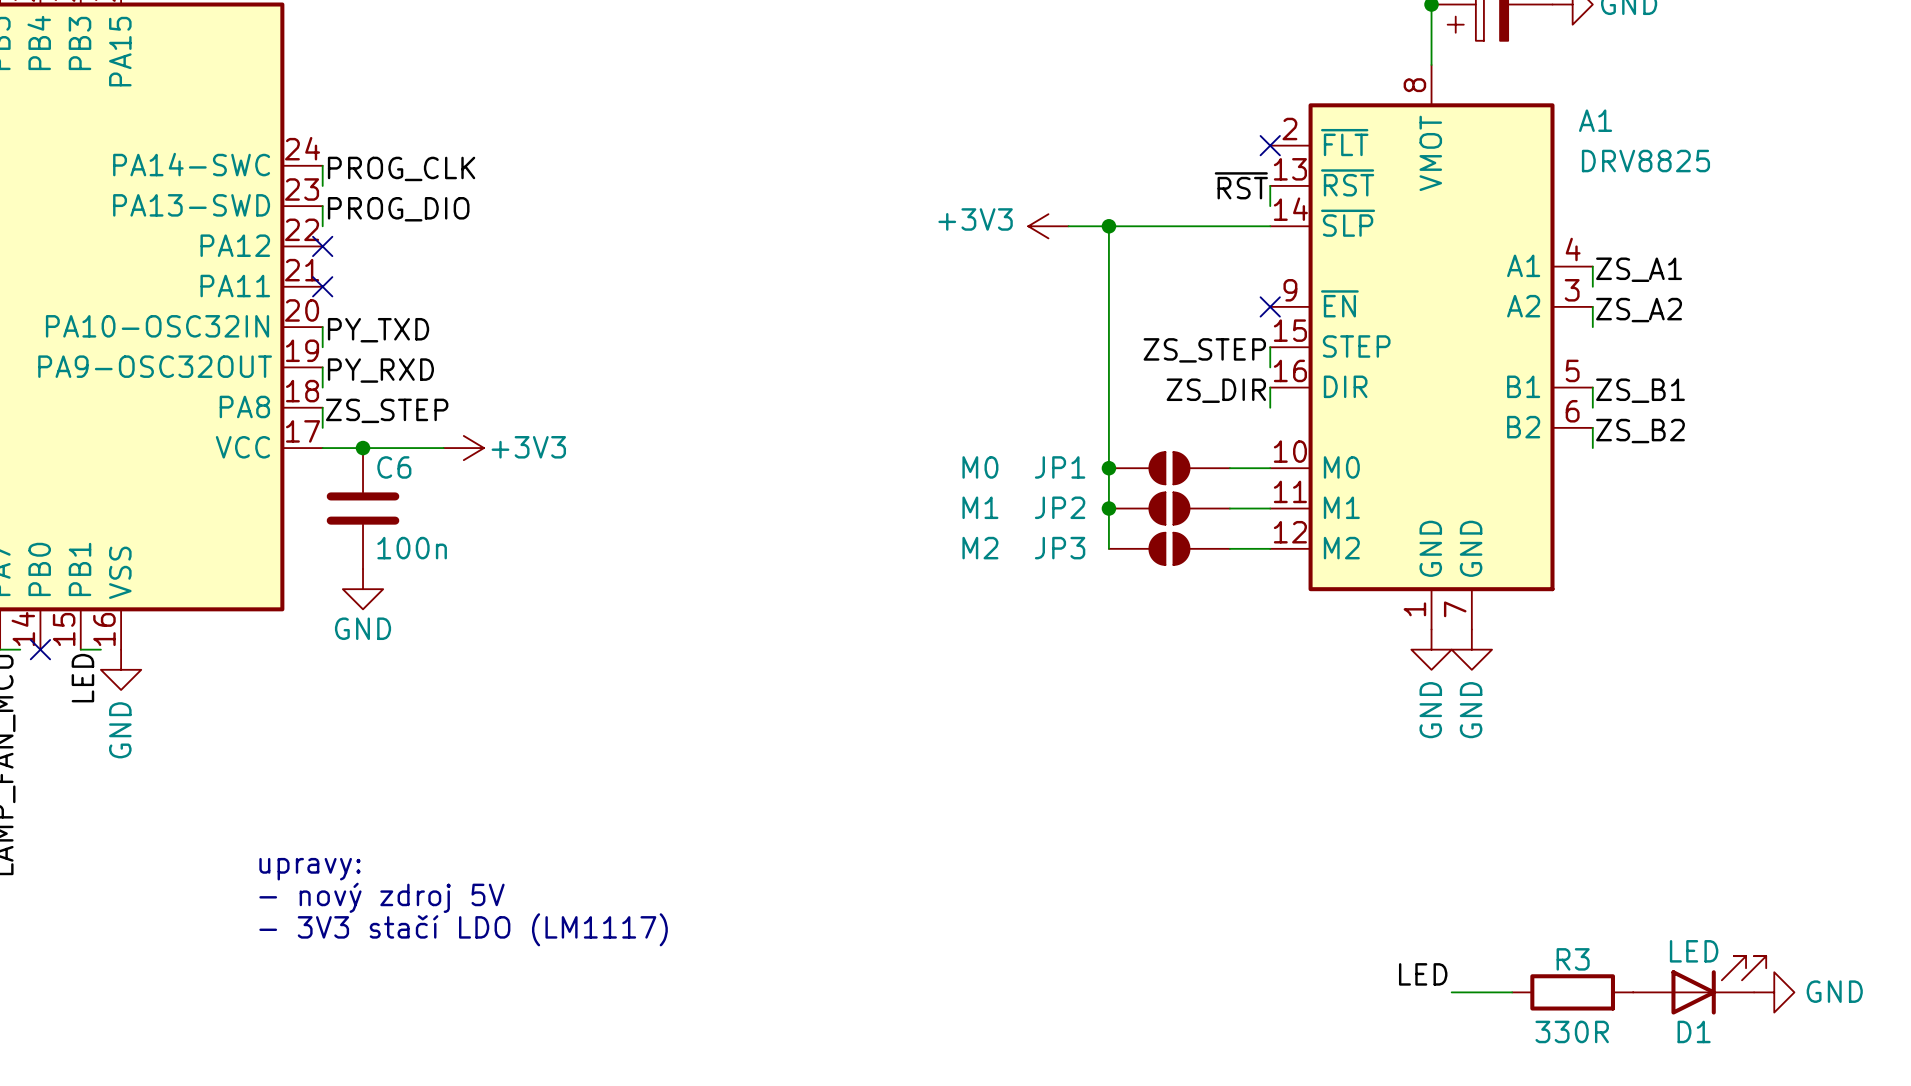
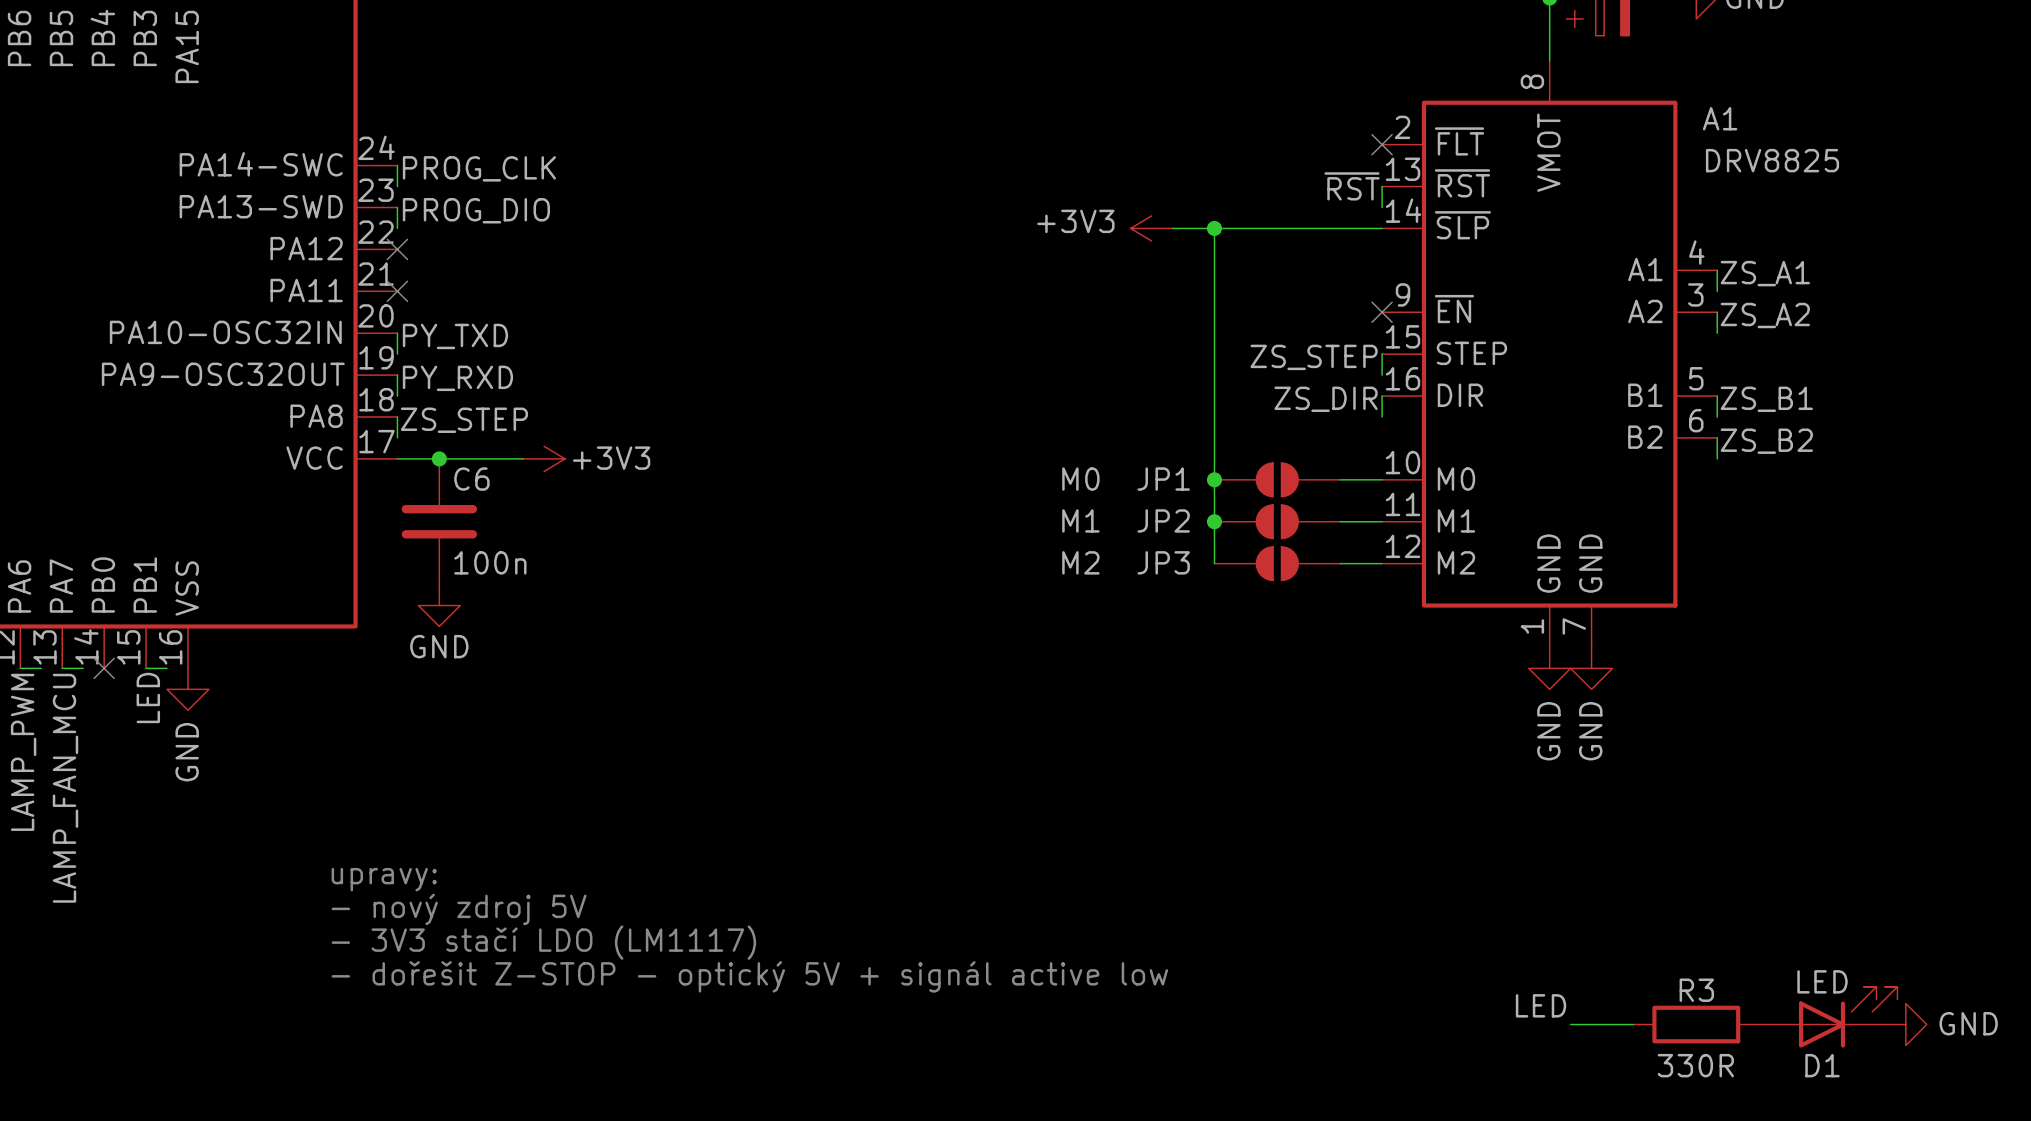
text position: upravy: (309, 869) -> upravy: (384, 879)
text position: - nový zdroj 5V (381, 897) -> - nový zdroj 5V (459, 909)
text position: - 3V3 stačí LDO (LM1117) (463, 929) -> - 3V3 stačí LDO (LM1117) (543, 942)
text: none -> - dořešit Z-STOP - optický 5V + signál active low (749, 976)

